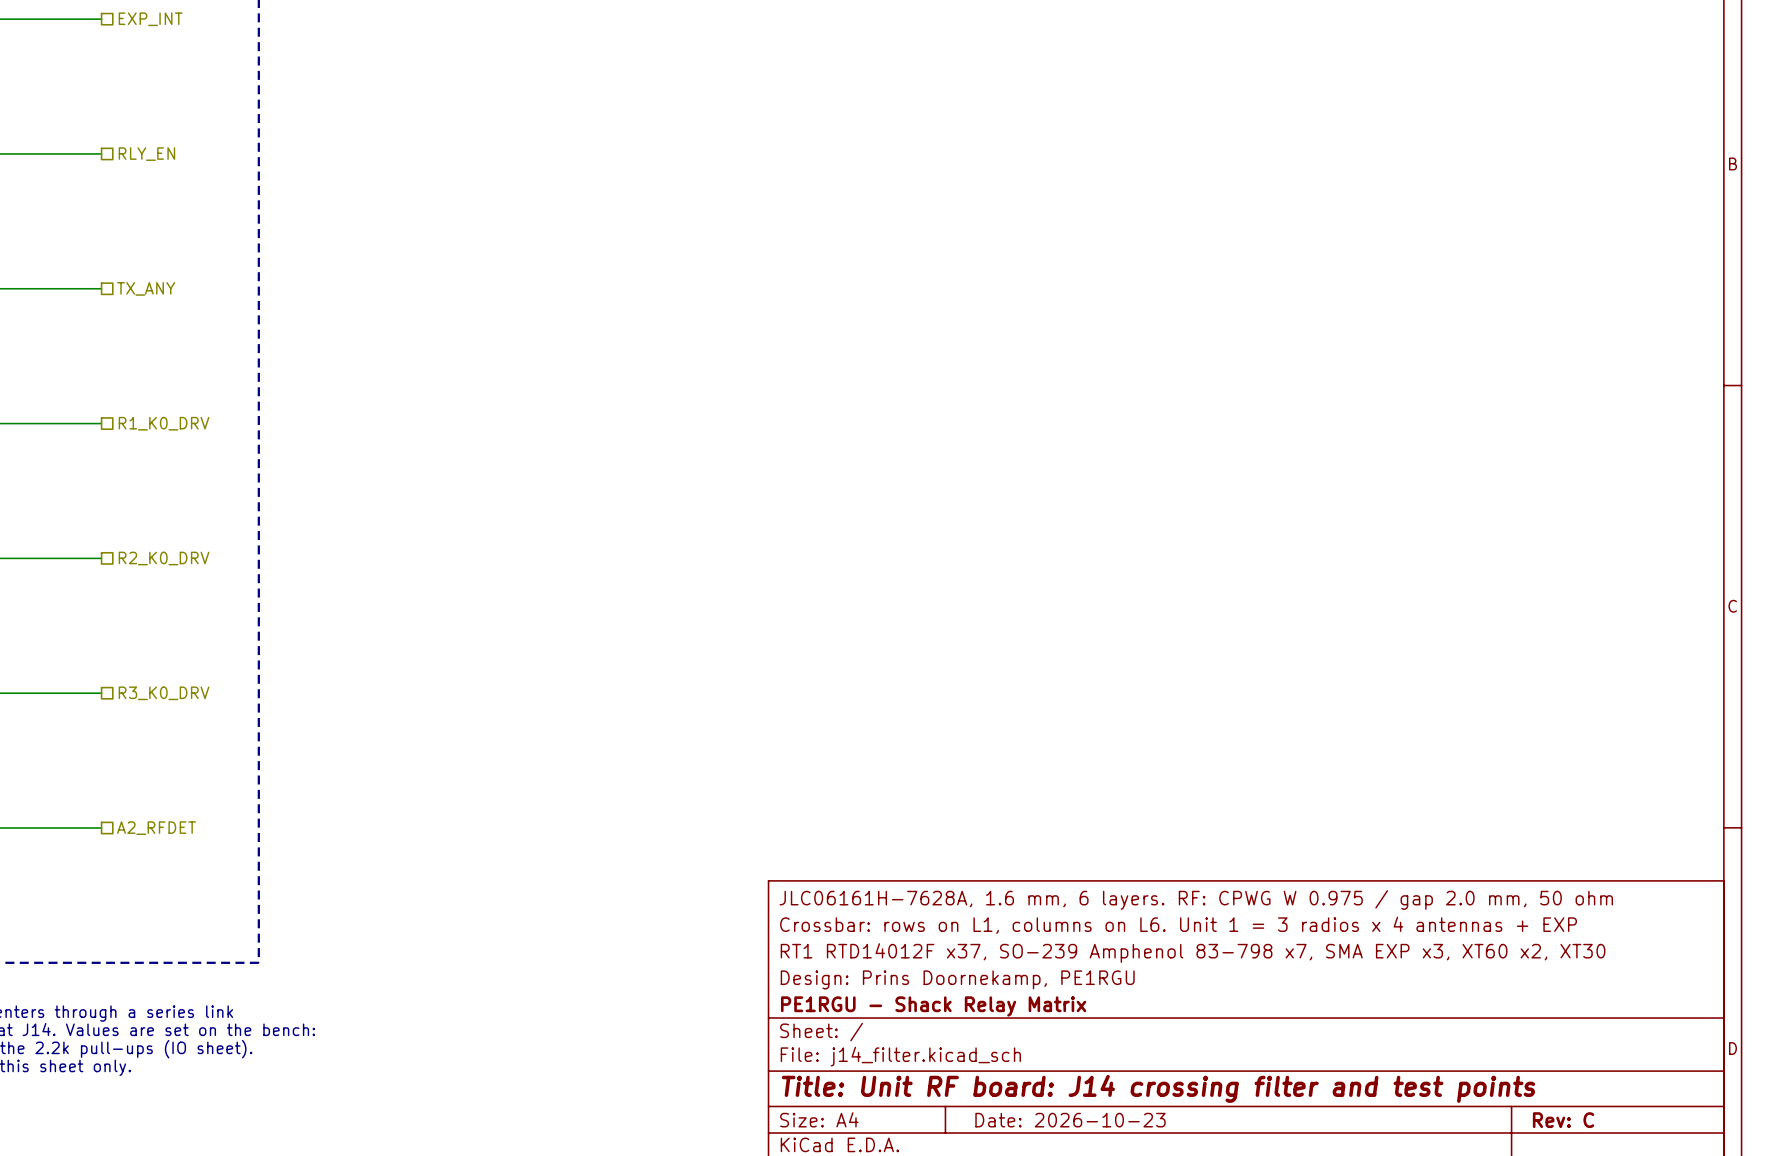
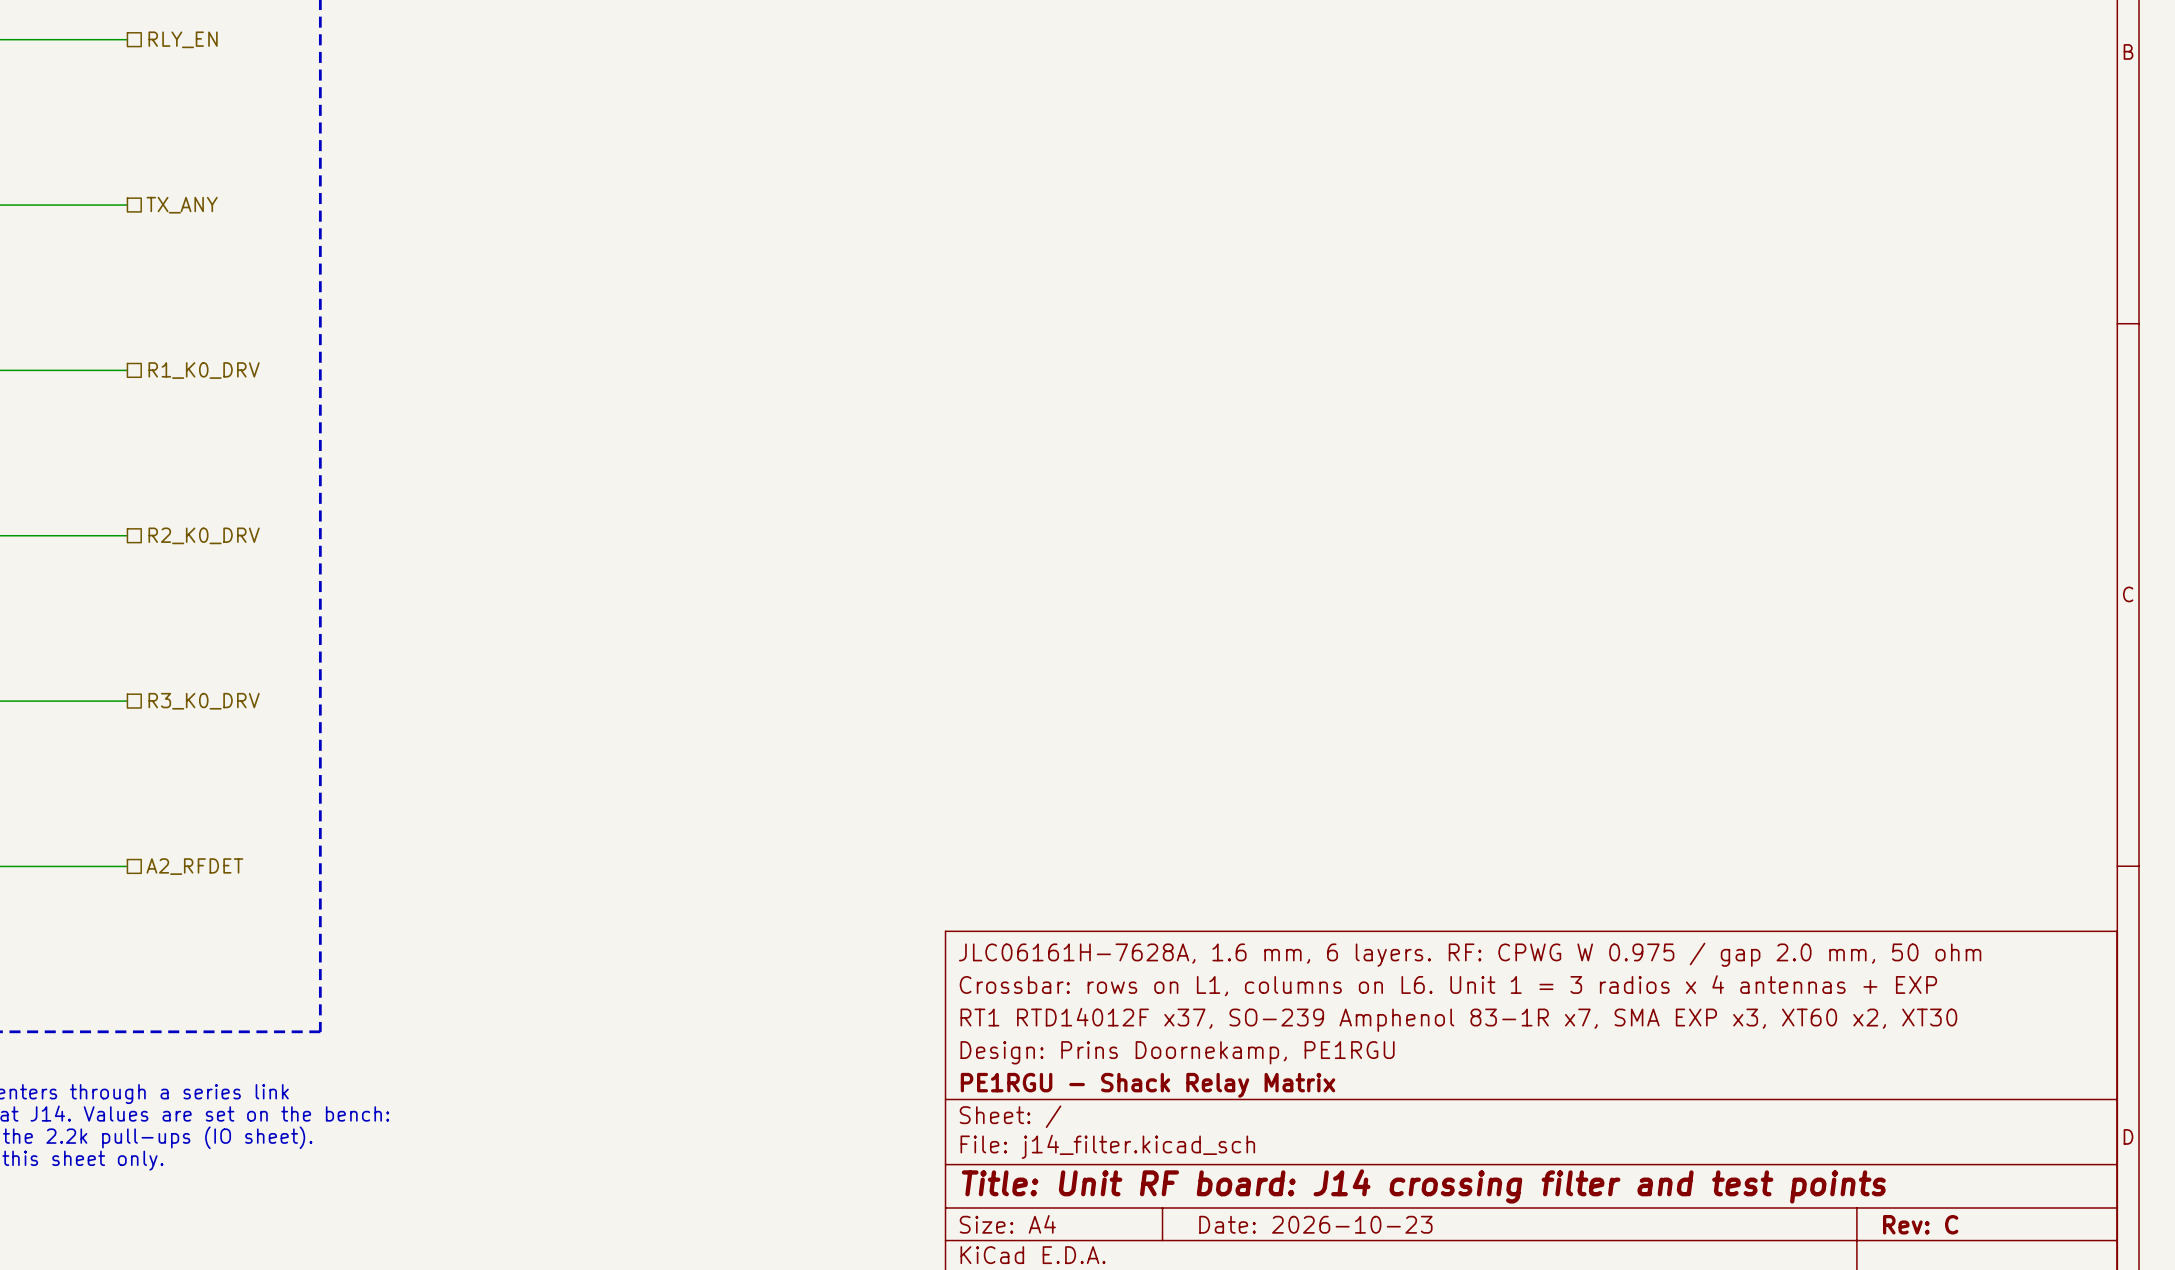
title block: RT1 RTD14012F x37, SO-239 Amphenol 83-798 x7, SMA EXP x3, XT60 x2, XT30 (1193, 953) -> RT1 RTD14012F x37, SO-239 Amphenol 83-1R x7, SMA EXP x3, XT60 x2, XT30 (1458, 1019)

